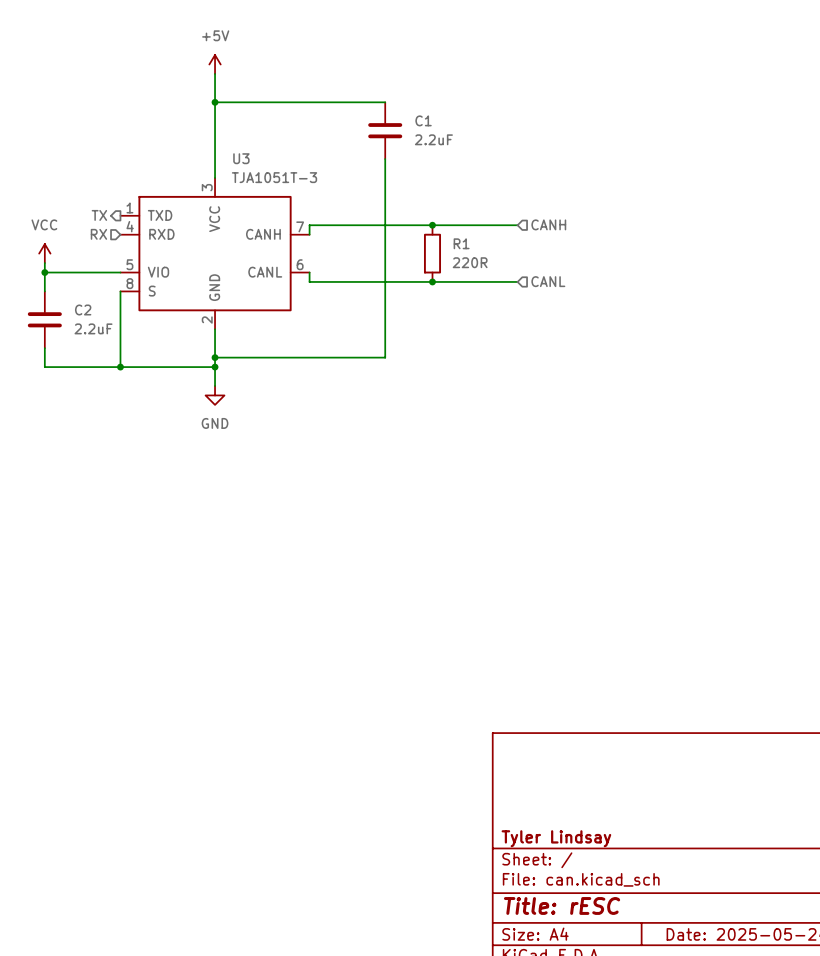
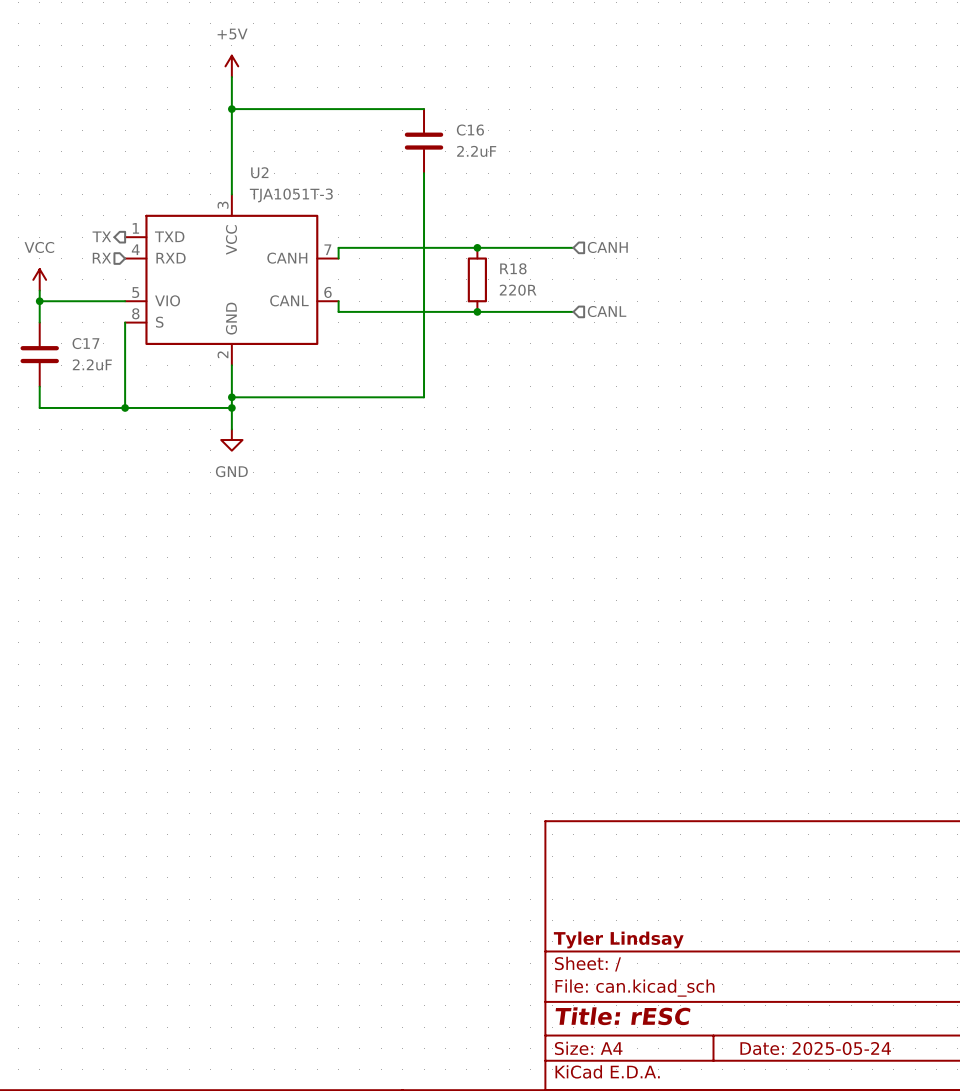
C1 name: C1 (423, 120) -> C16 (470, 130)
U3 name: U3 (241, 158) -> U2 (259, 172)
R1 name: R1 (461, 243) -> R18 (513, 268)
C2 name: C2 (83, 309) -> C17 (85, 343)

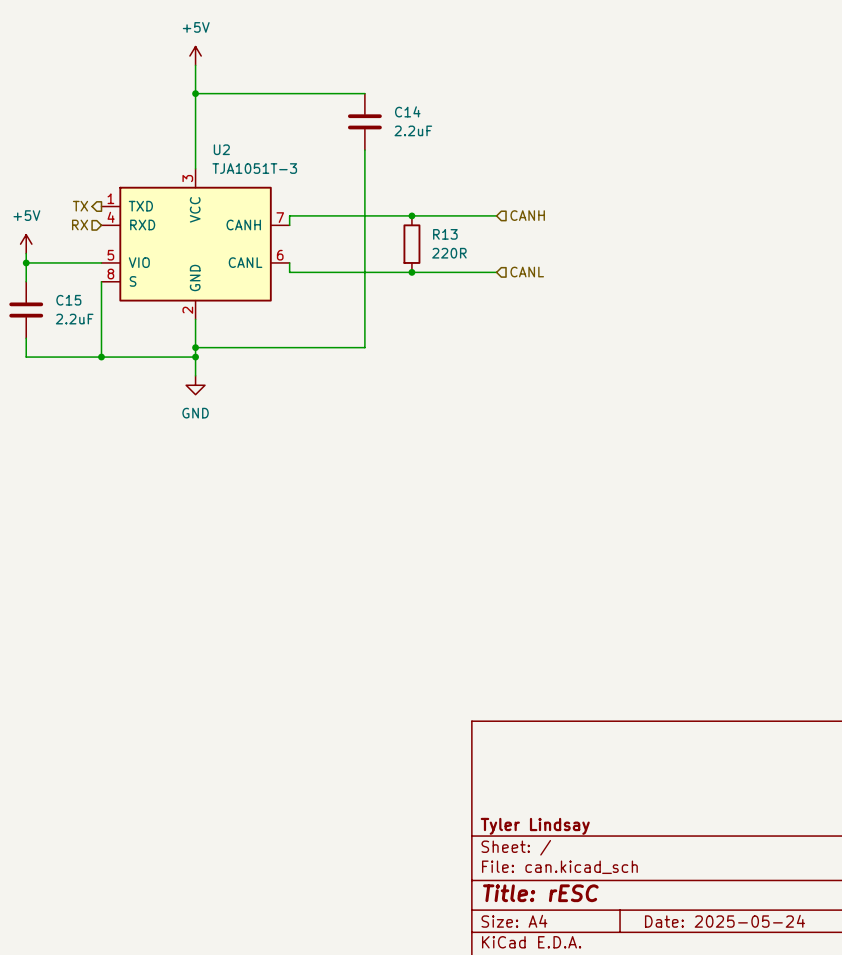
C16 name: C16 (470, 130) -> C14 (407, 111)
R18 name: R18 (513, 268) -> R13 (445, 234)
power symbol: VCC (39, 279) -> +5V (26, 244)
C17 name: C17 (85, 343) -> C15 (68, 300)

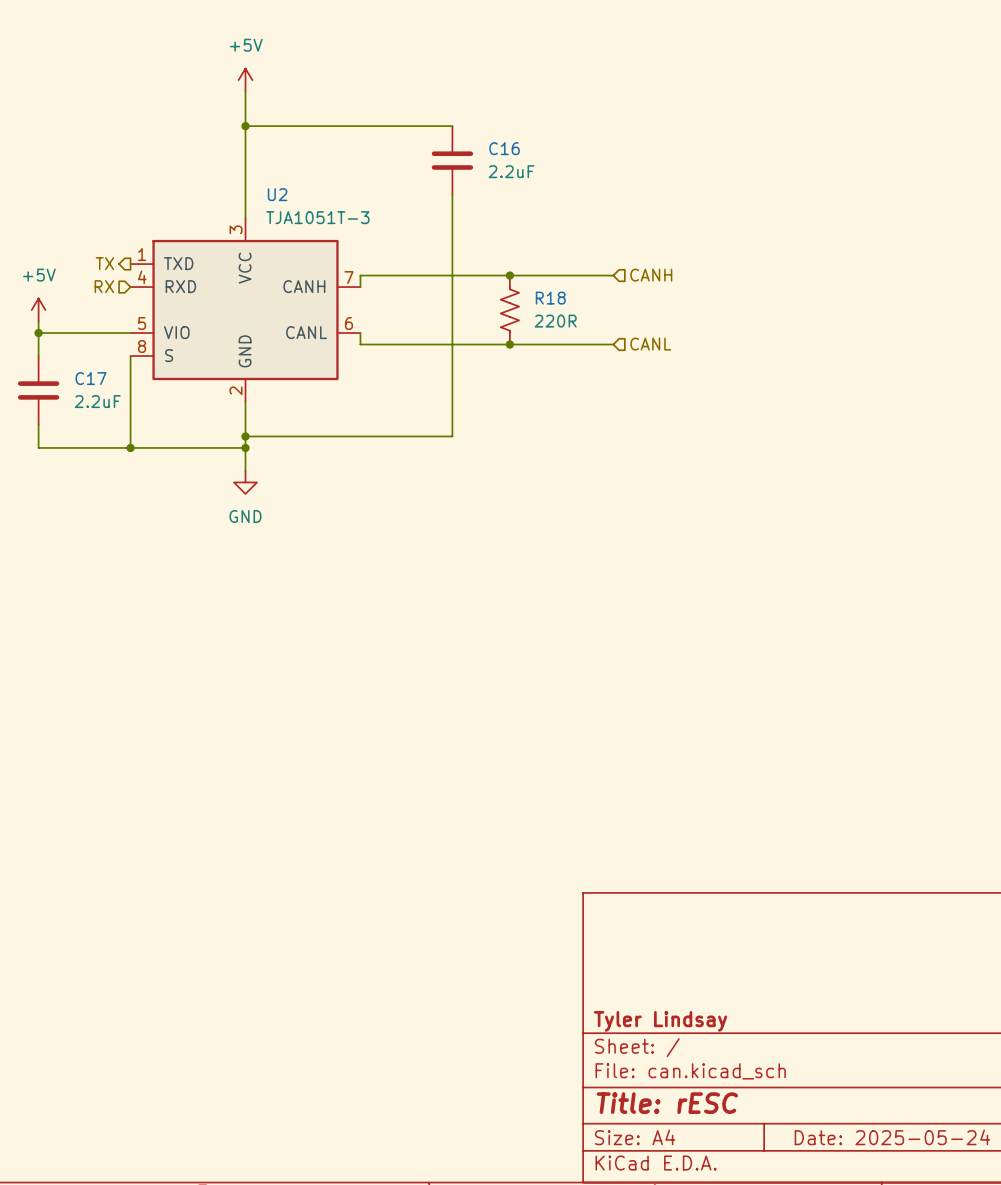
C14 name: C14 (407, 111) -> C16 (504, 148)
R13: 220R (411, 244) -> none
R18: none -> 220R (509, 310)
C15 name: C15 (68, 300) -> C17 (90, 378)

